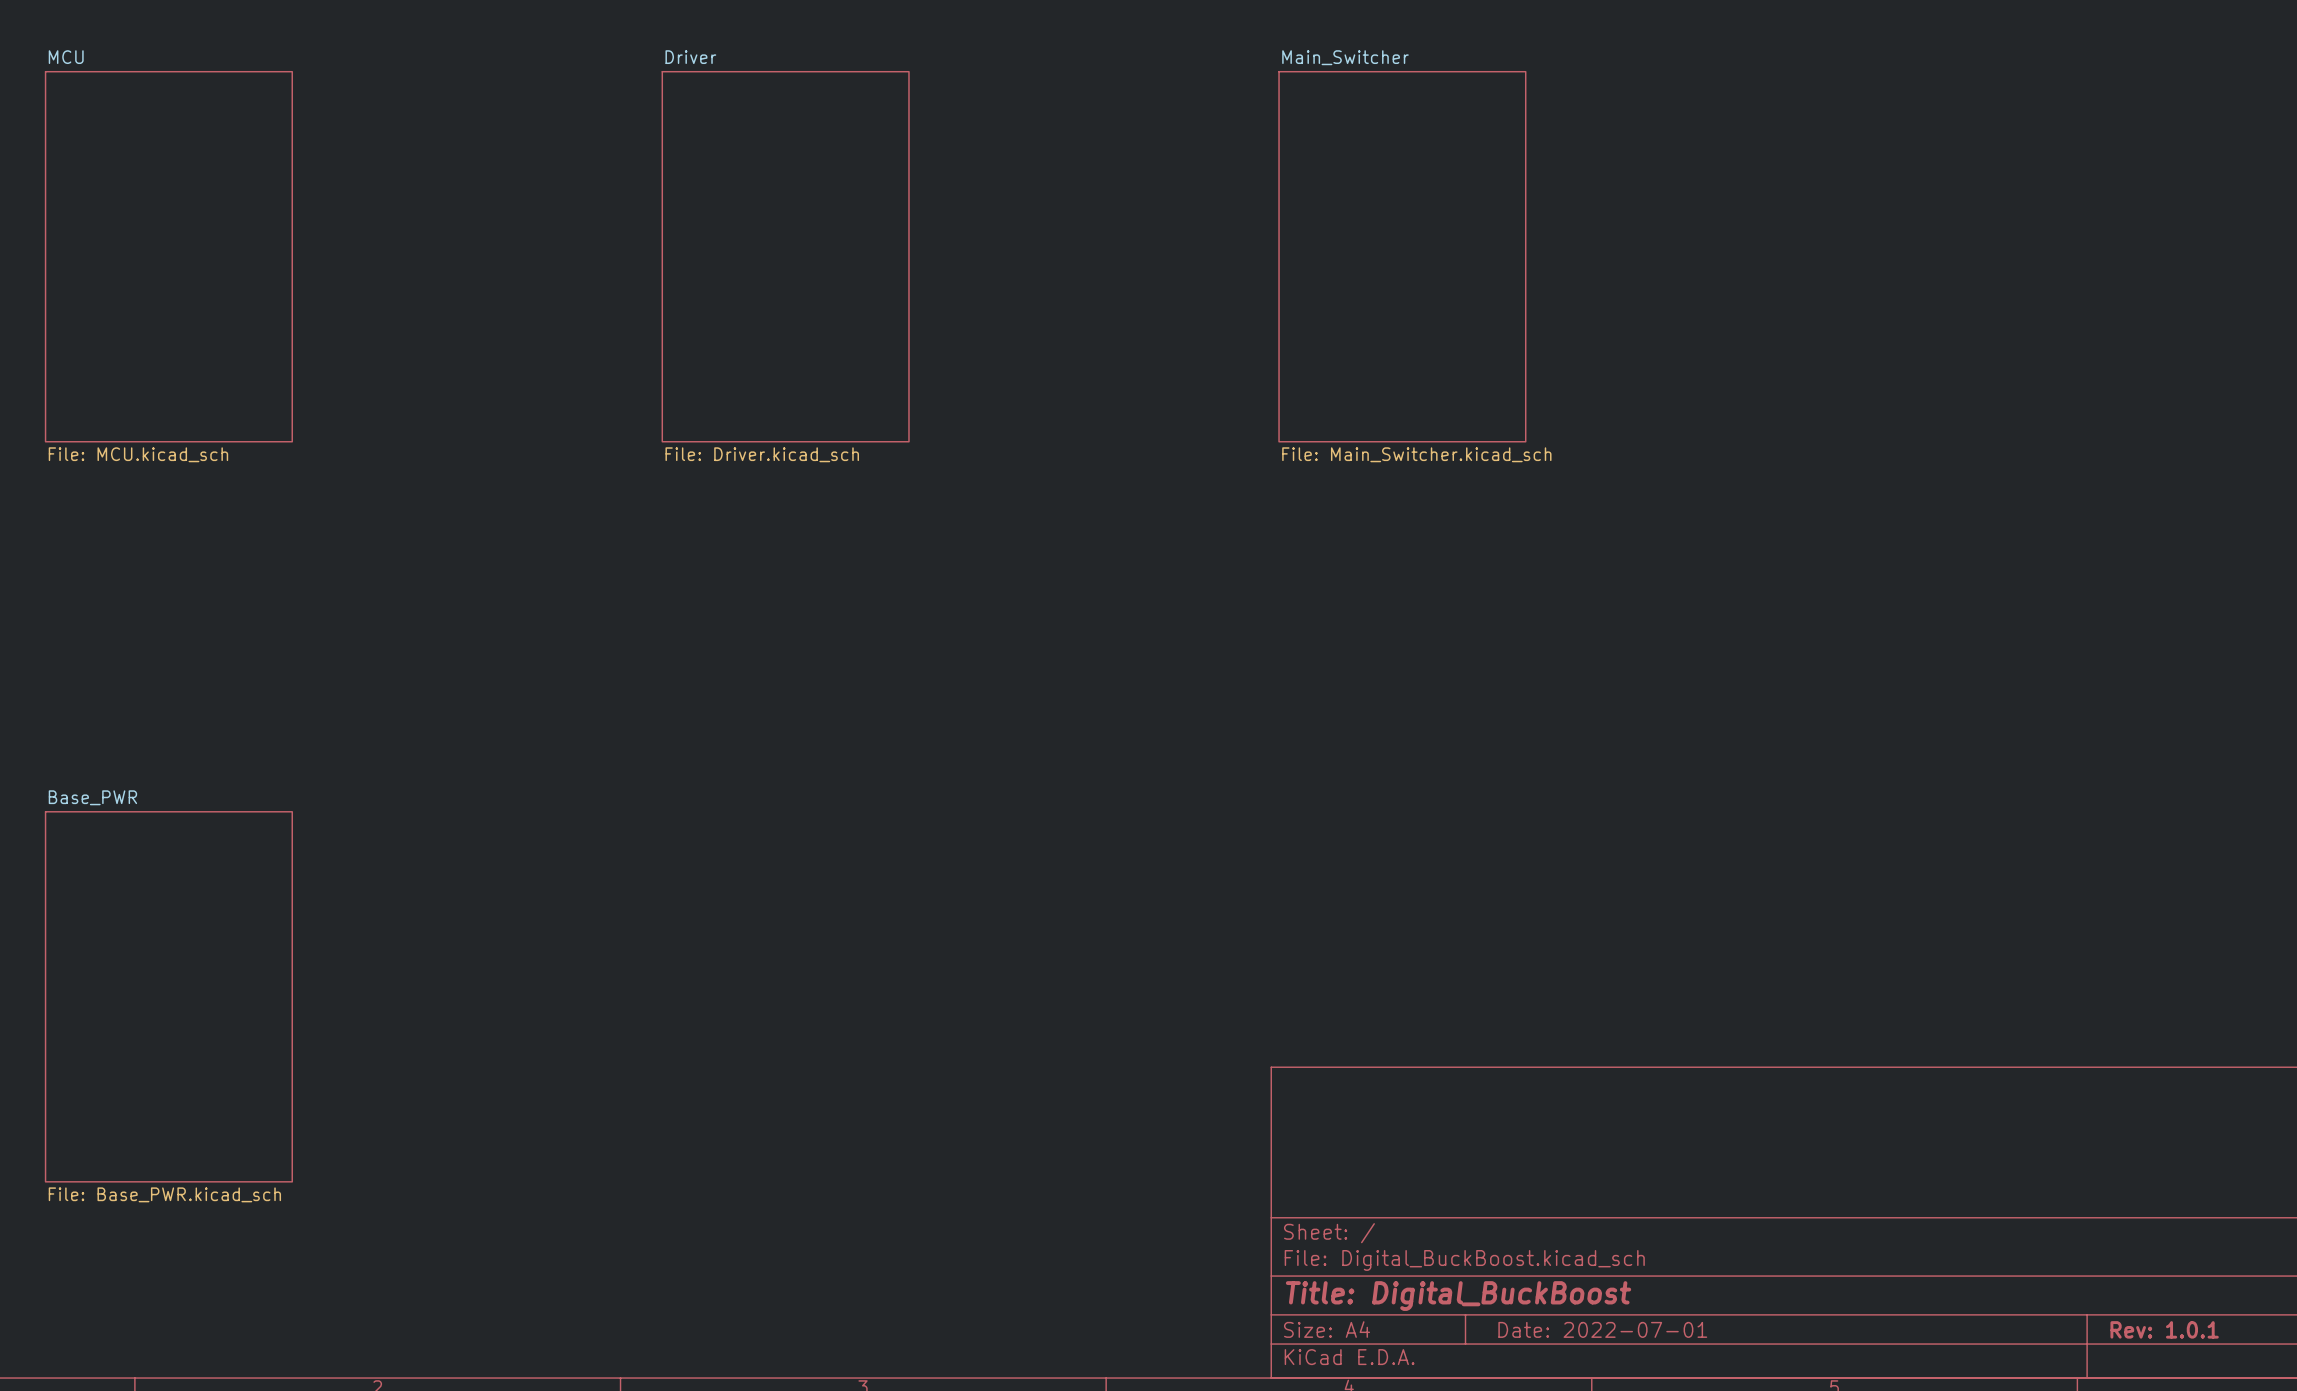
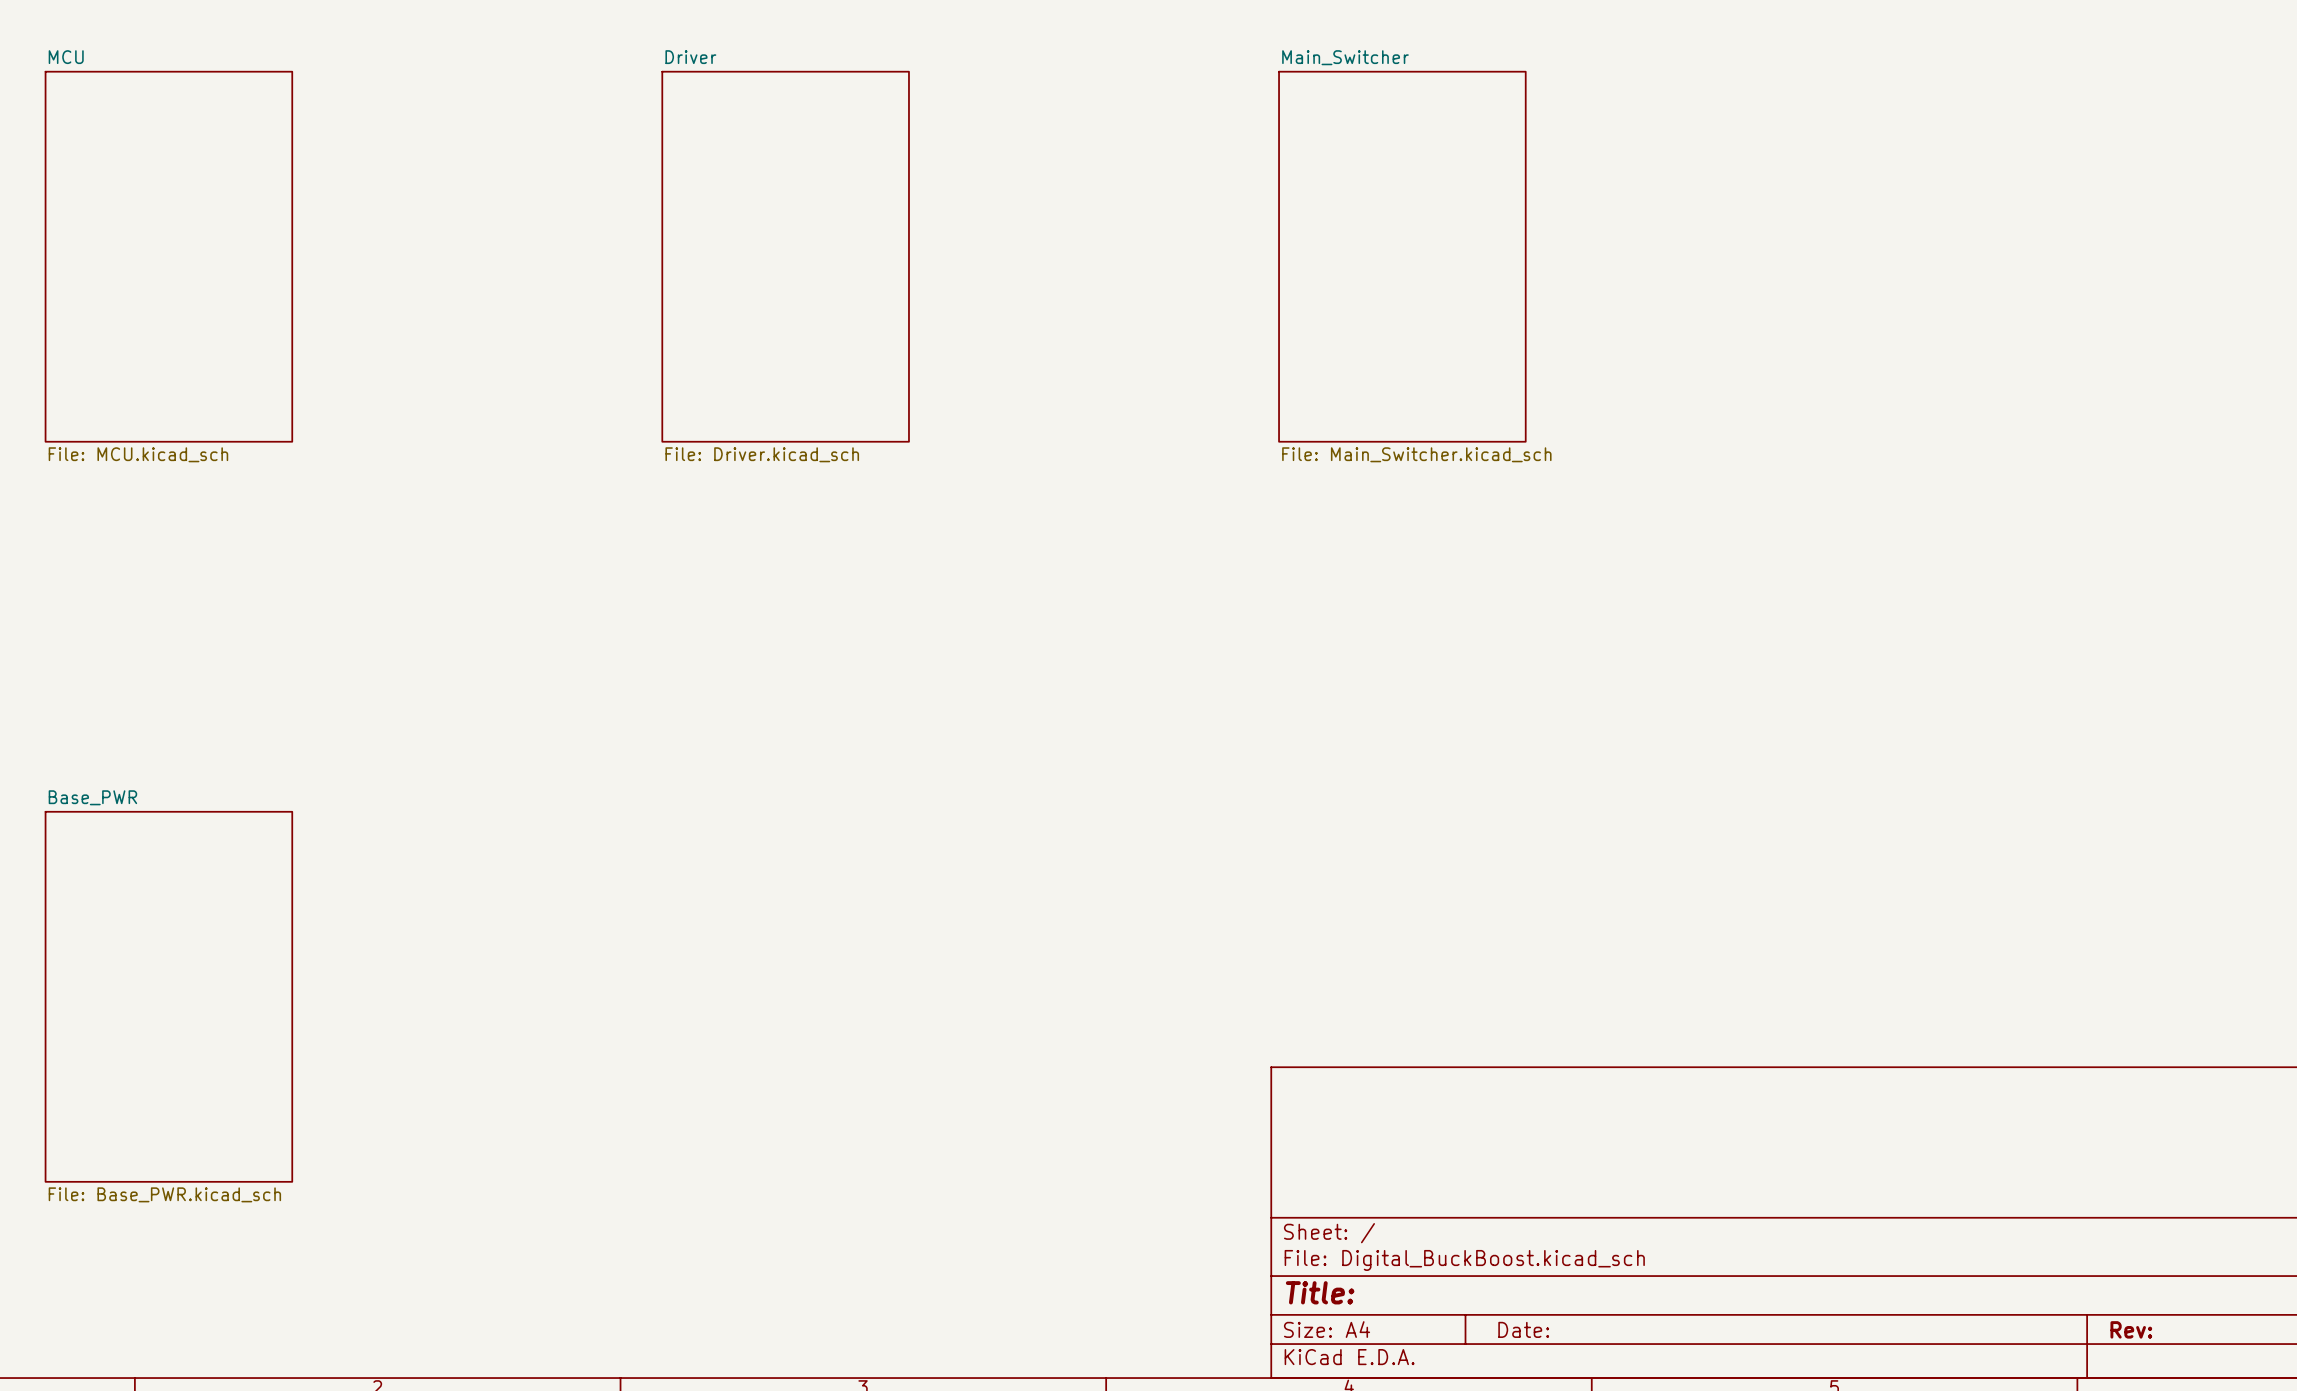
title block: Title: Digital_BuckBoost (1458, 1296) -> Title: (1320, 1292)
title block: Date: 2022-07-01 (1602, 1329) -> Date: (1523, 1329)
title block: Rev: 1.0.1 (2164, 1329) -> Rev: (2131, 1329)

